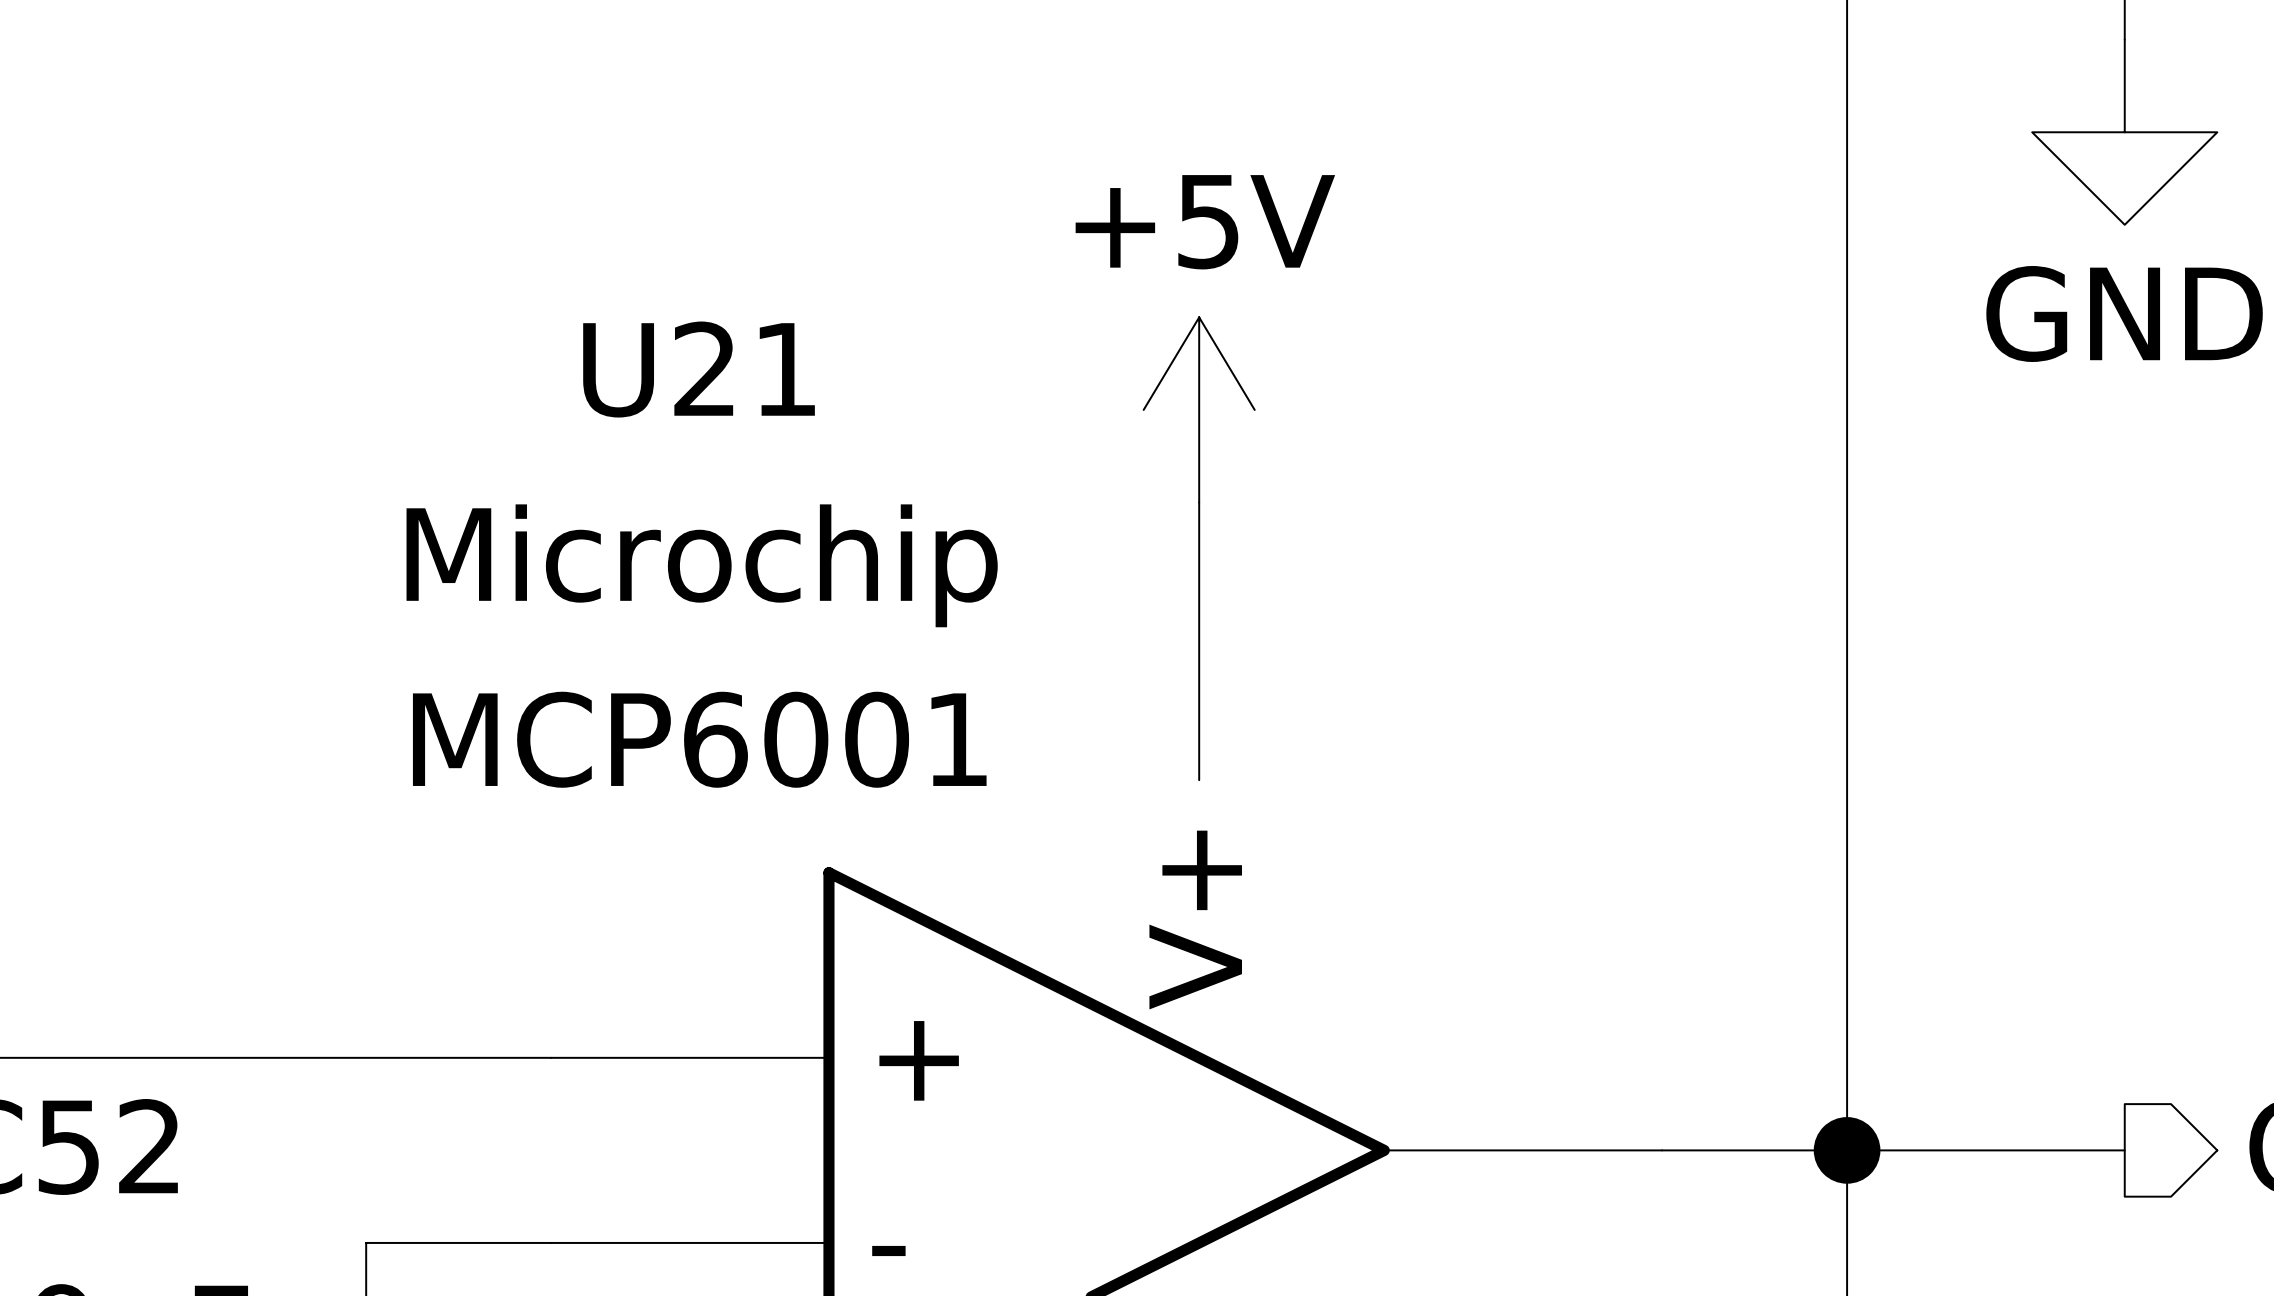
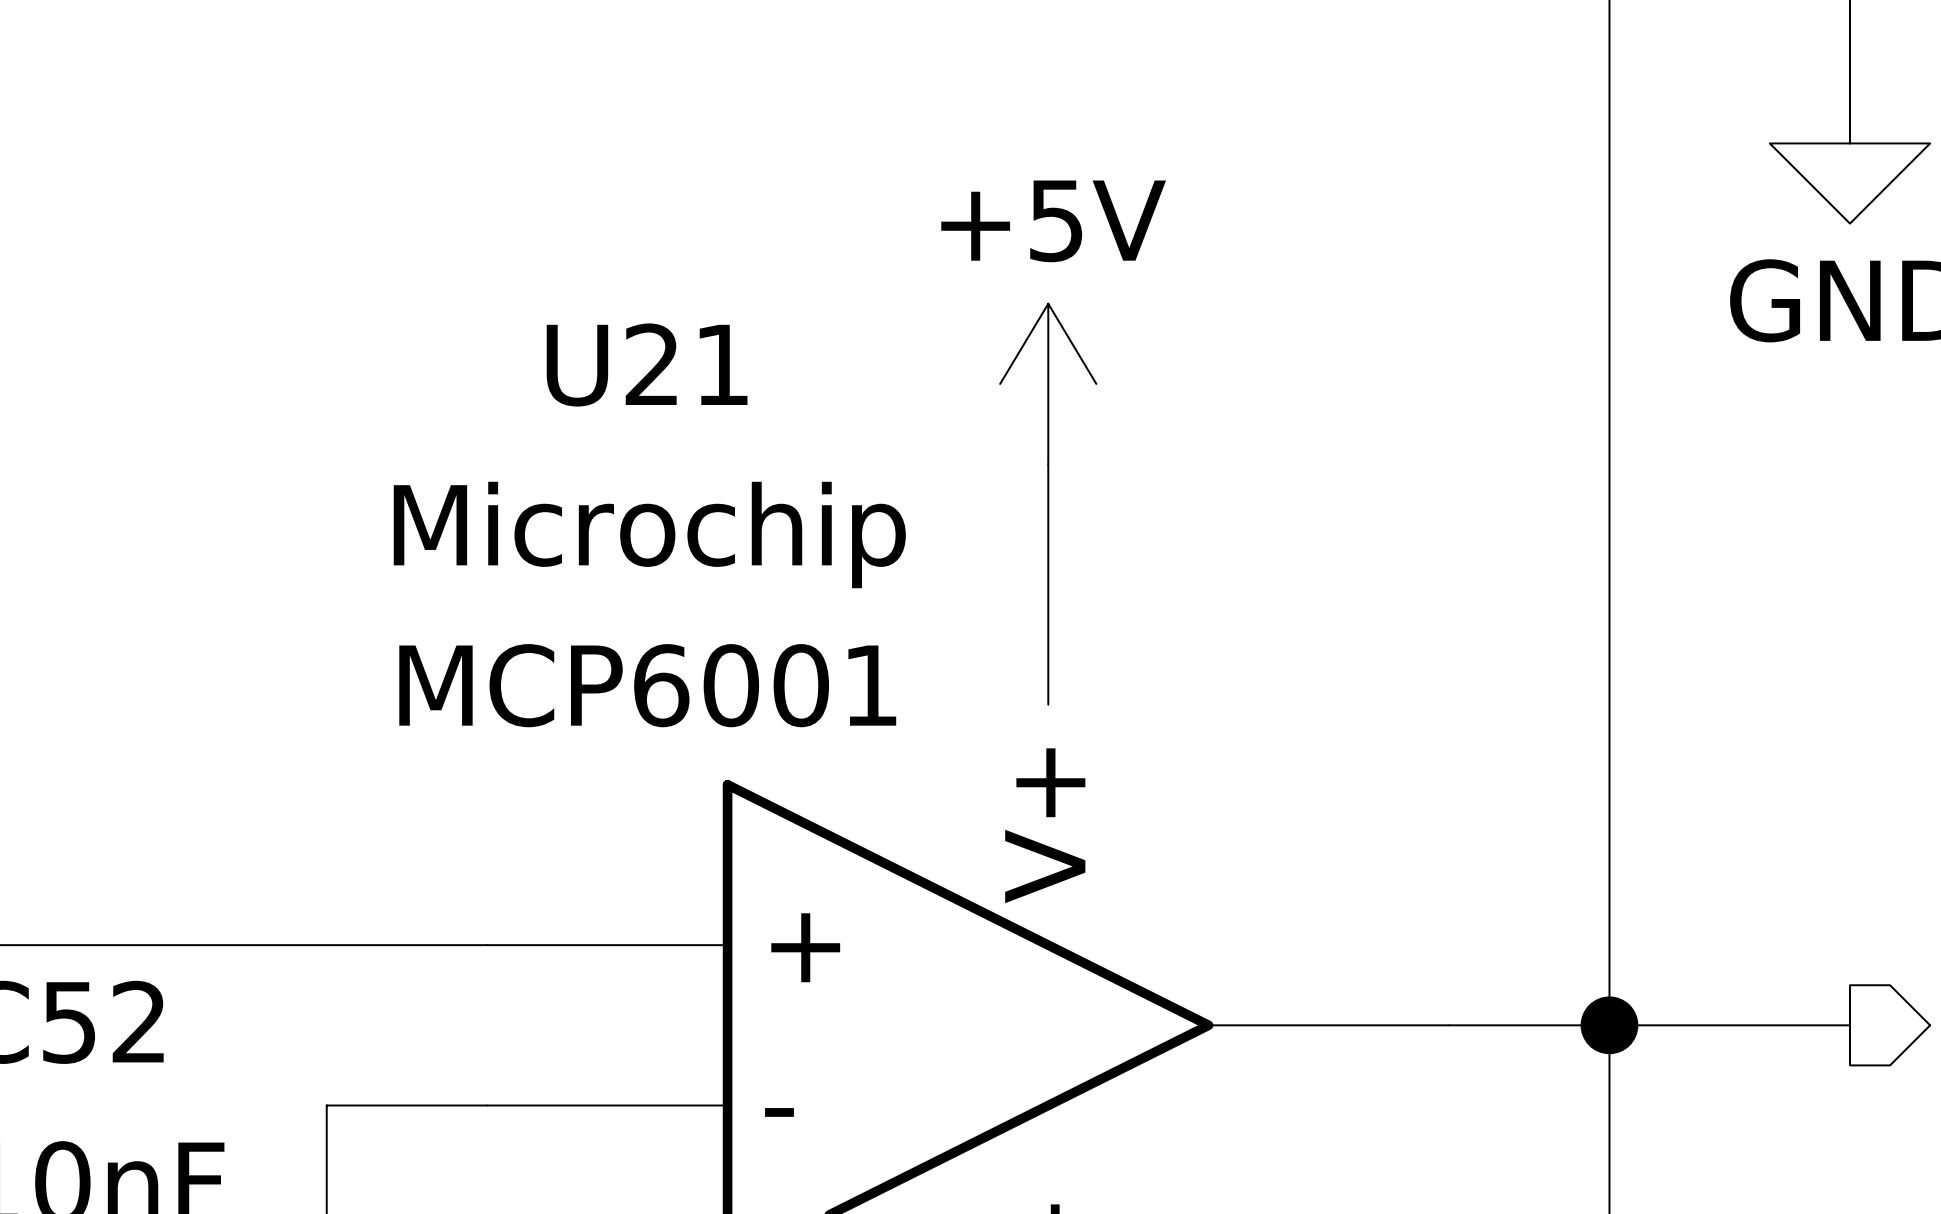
U21 name position: U21 (699, 369) -> U21 (647, 364)
U21 text position: Microchip (702, 565) -> Microchip (649, 535)
U21 text position: MCP6001 (699, 739) -> MCP6001 (647, 685)

